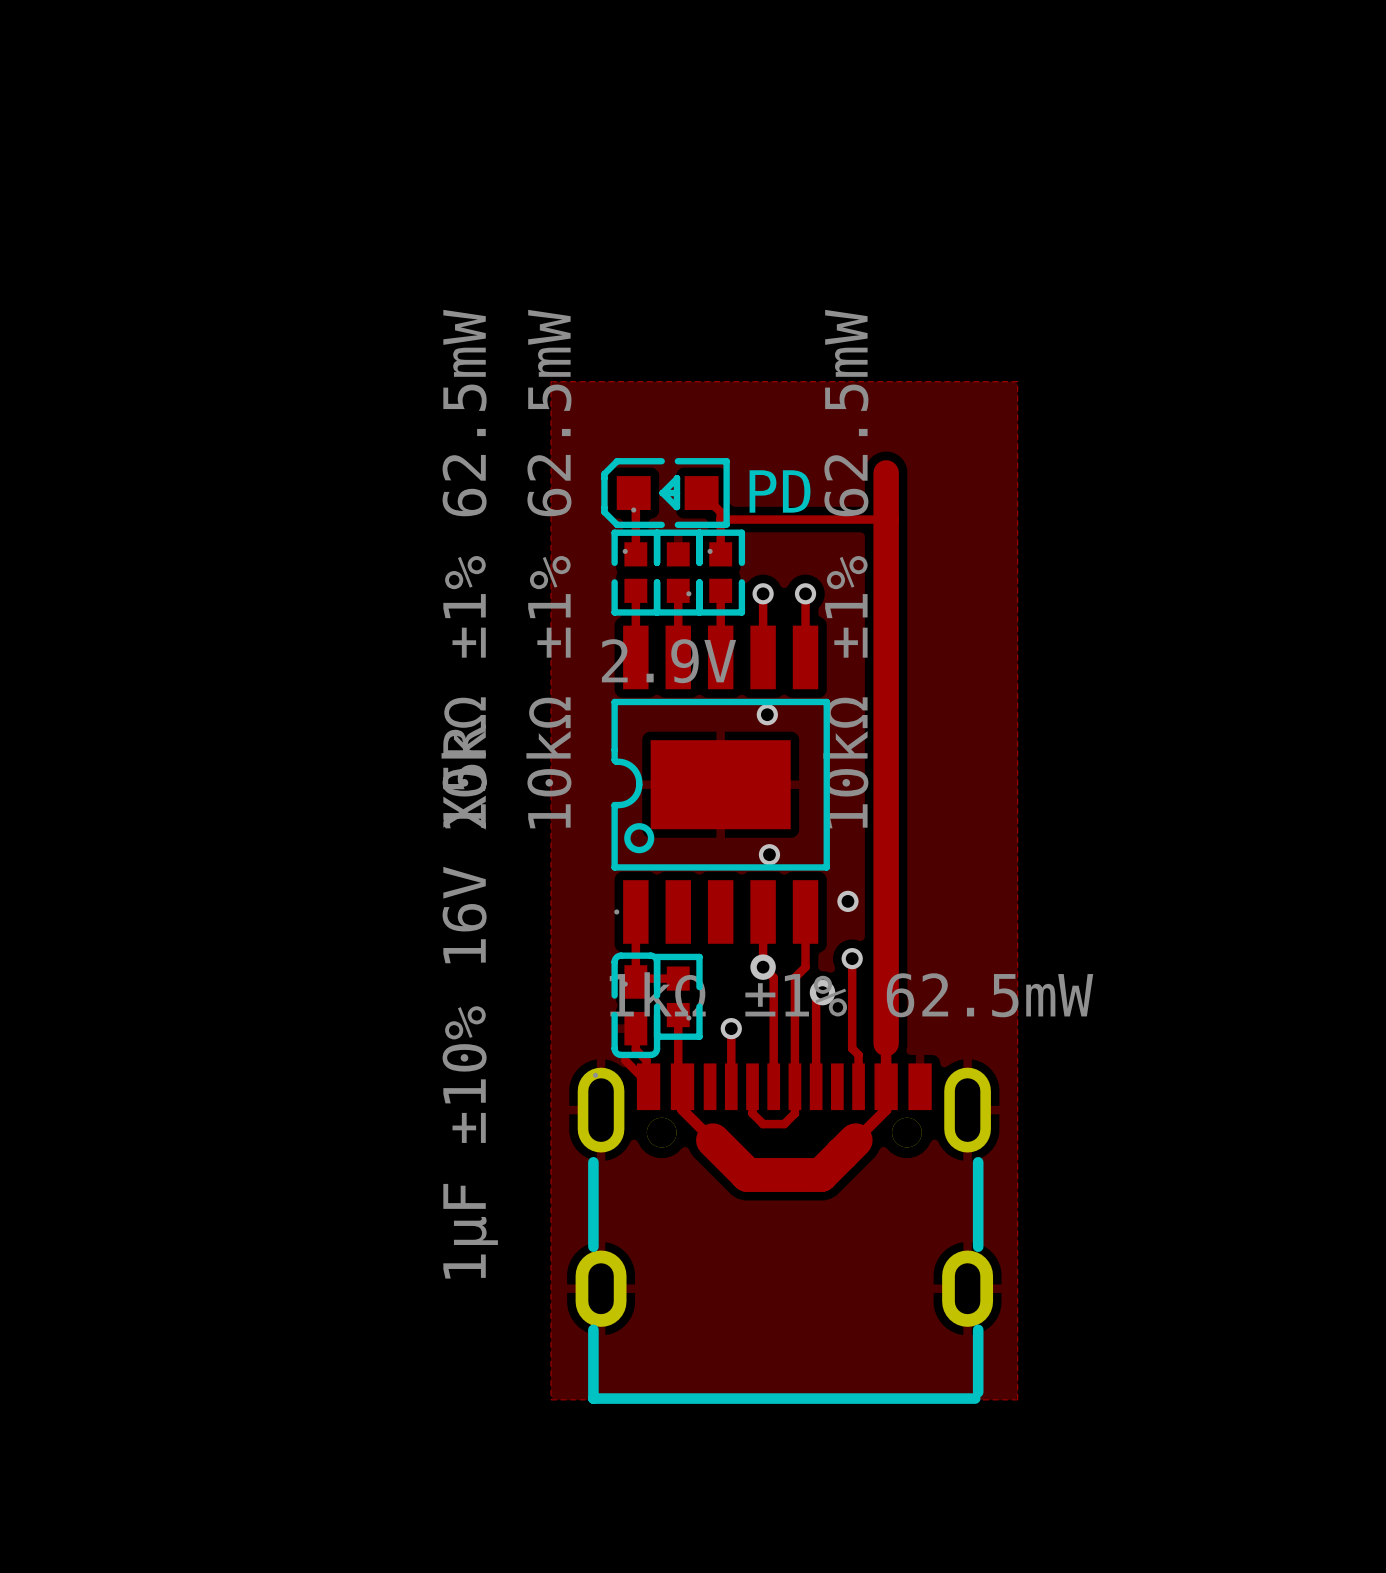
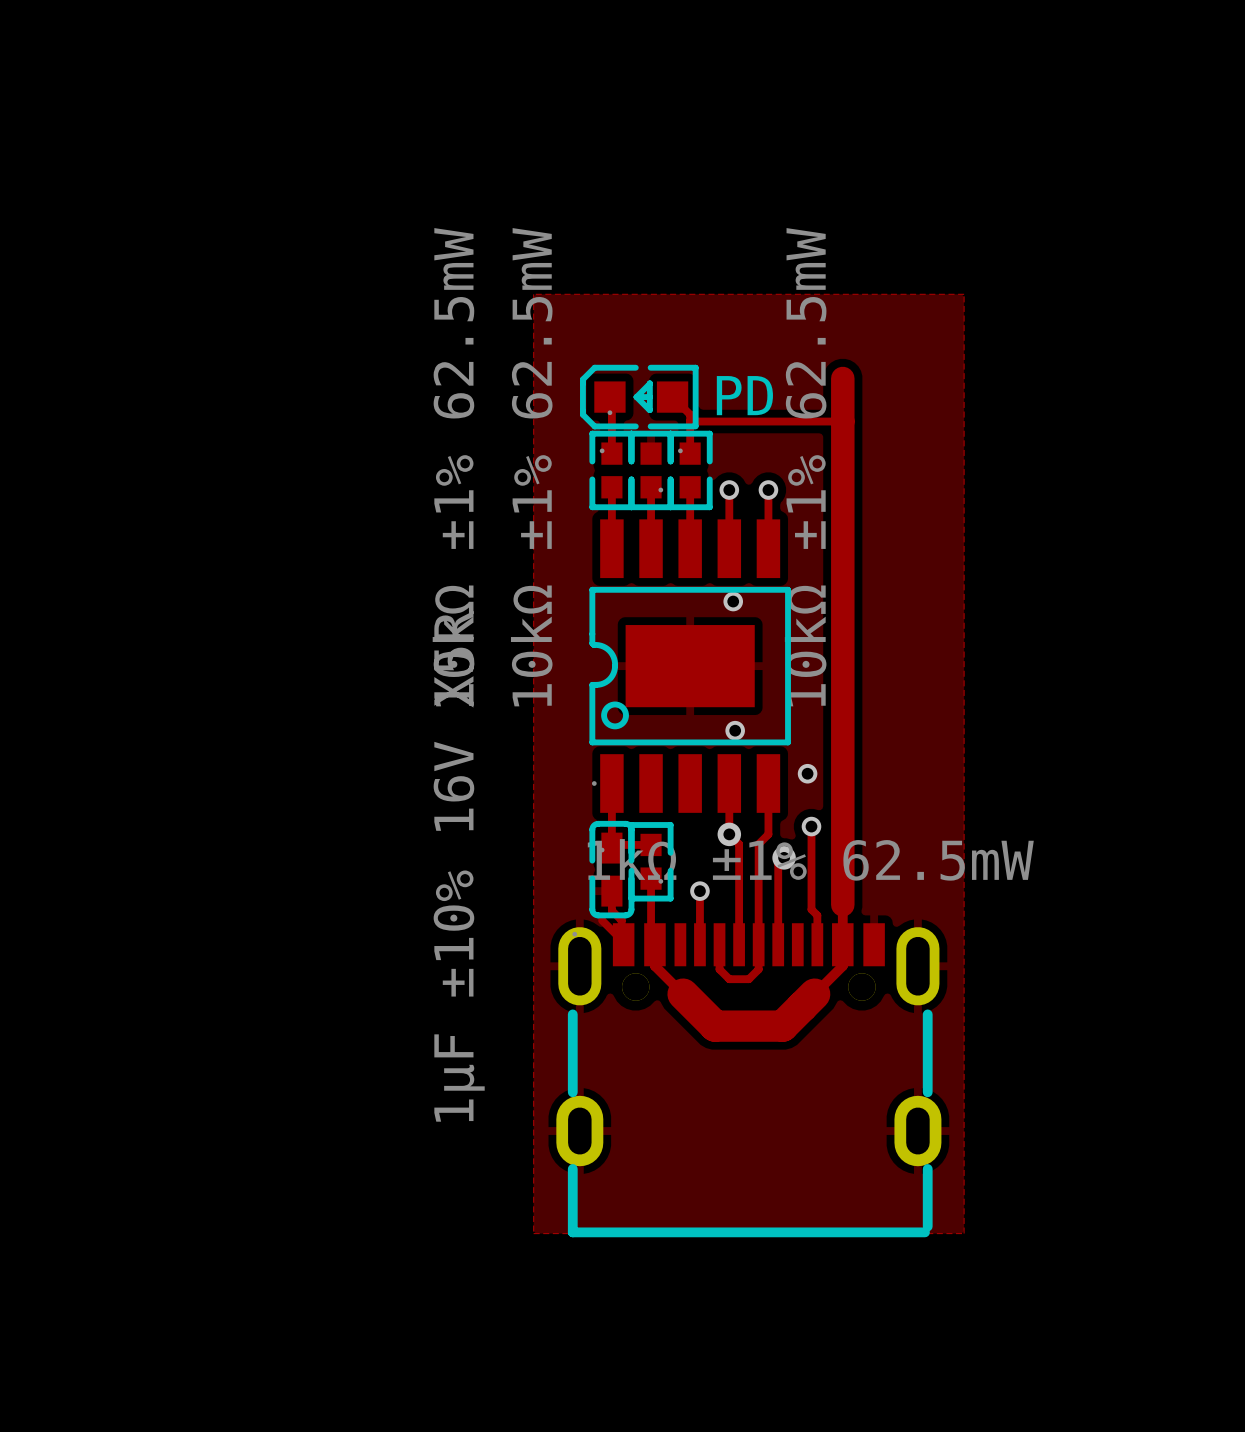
part value: 2.9V (669, 661) -> none

